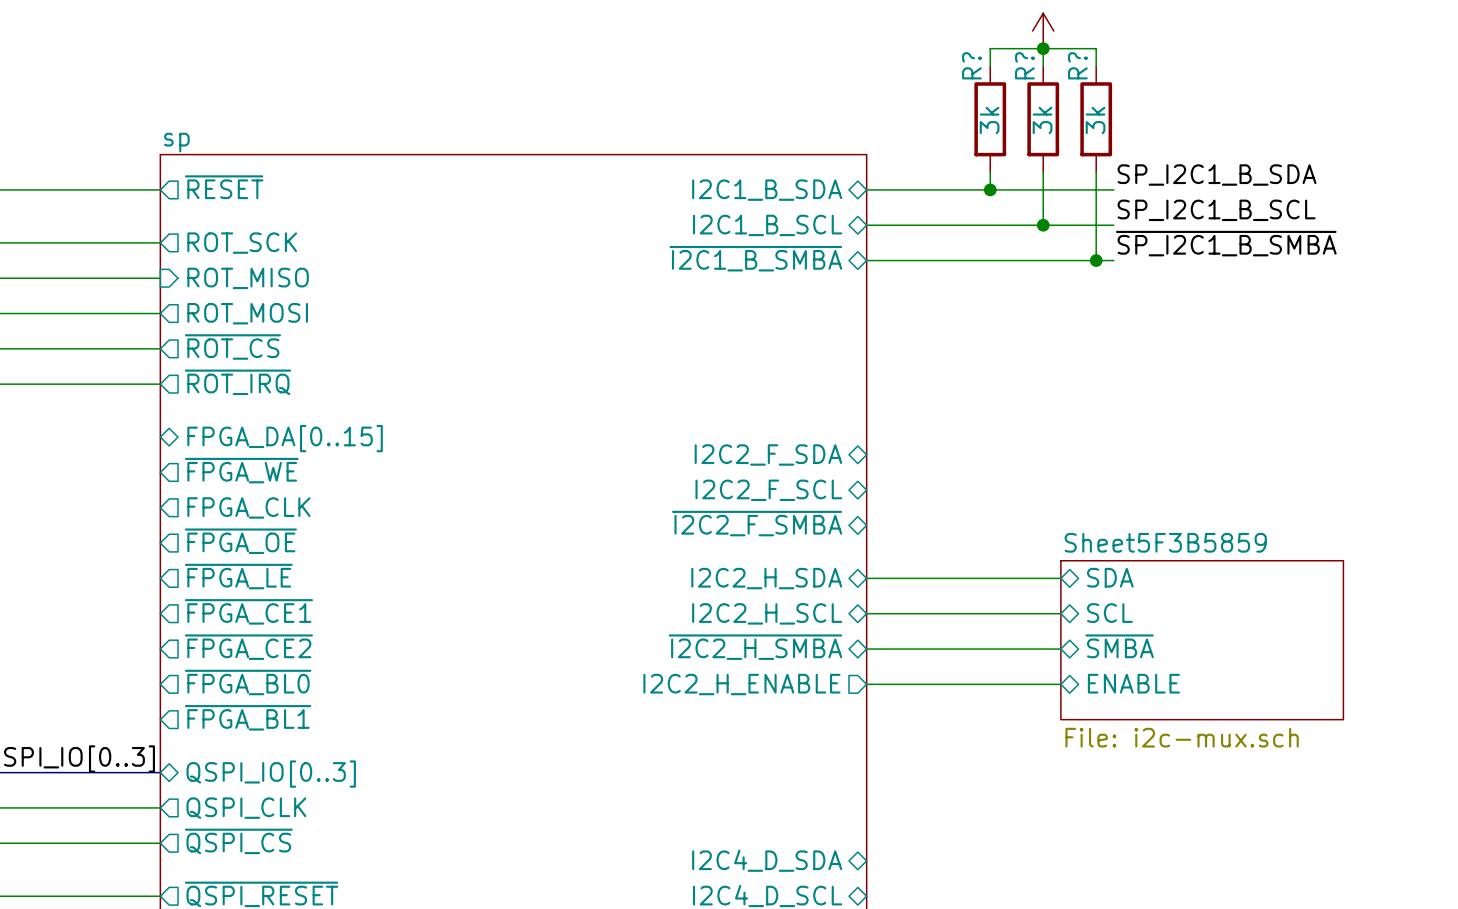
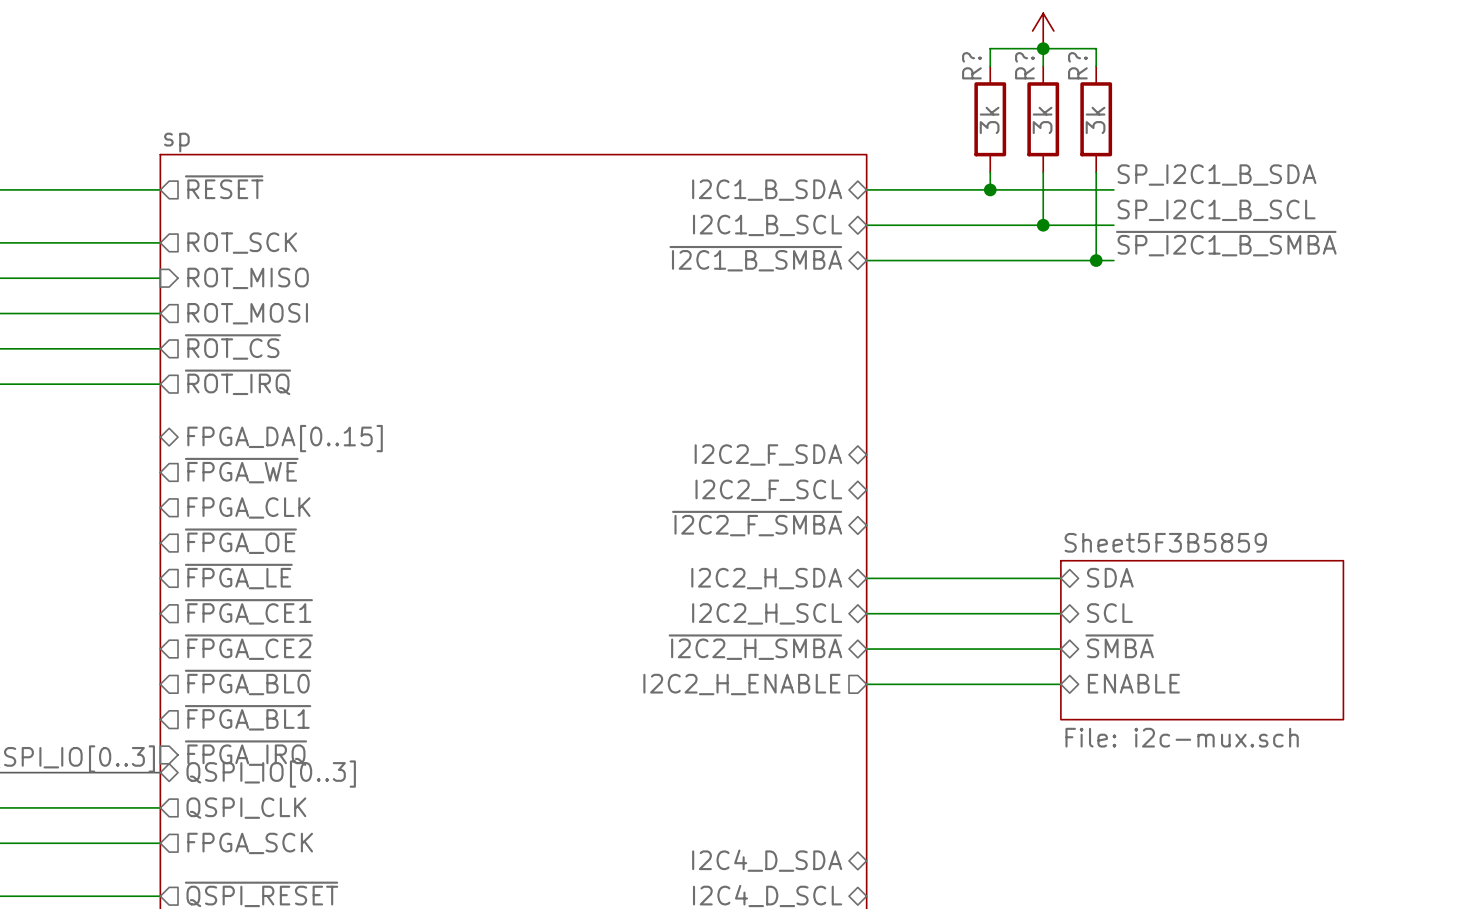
sheet pin: none -> ~{FPGA_IRQ} (245, 753)
sheet pin: ~{QSPI_CS} (238, 841) -> FPGA_SCK (250, 843)

